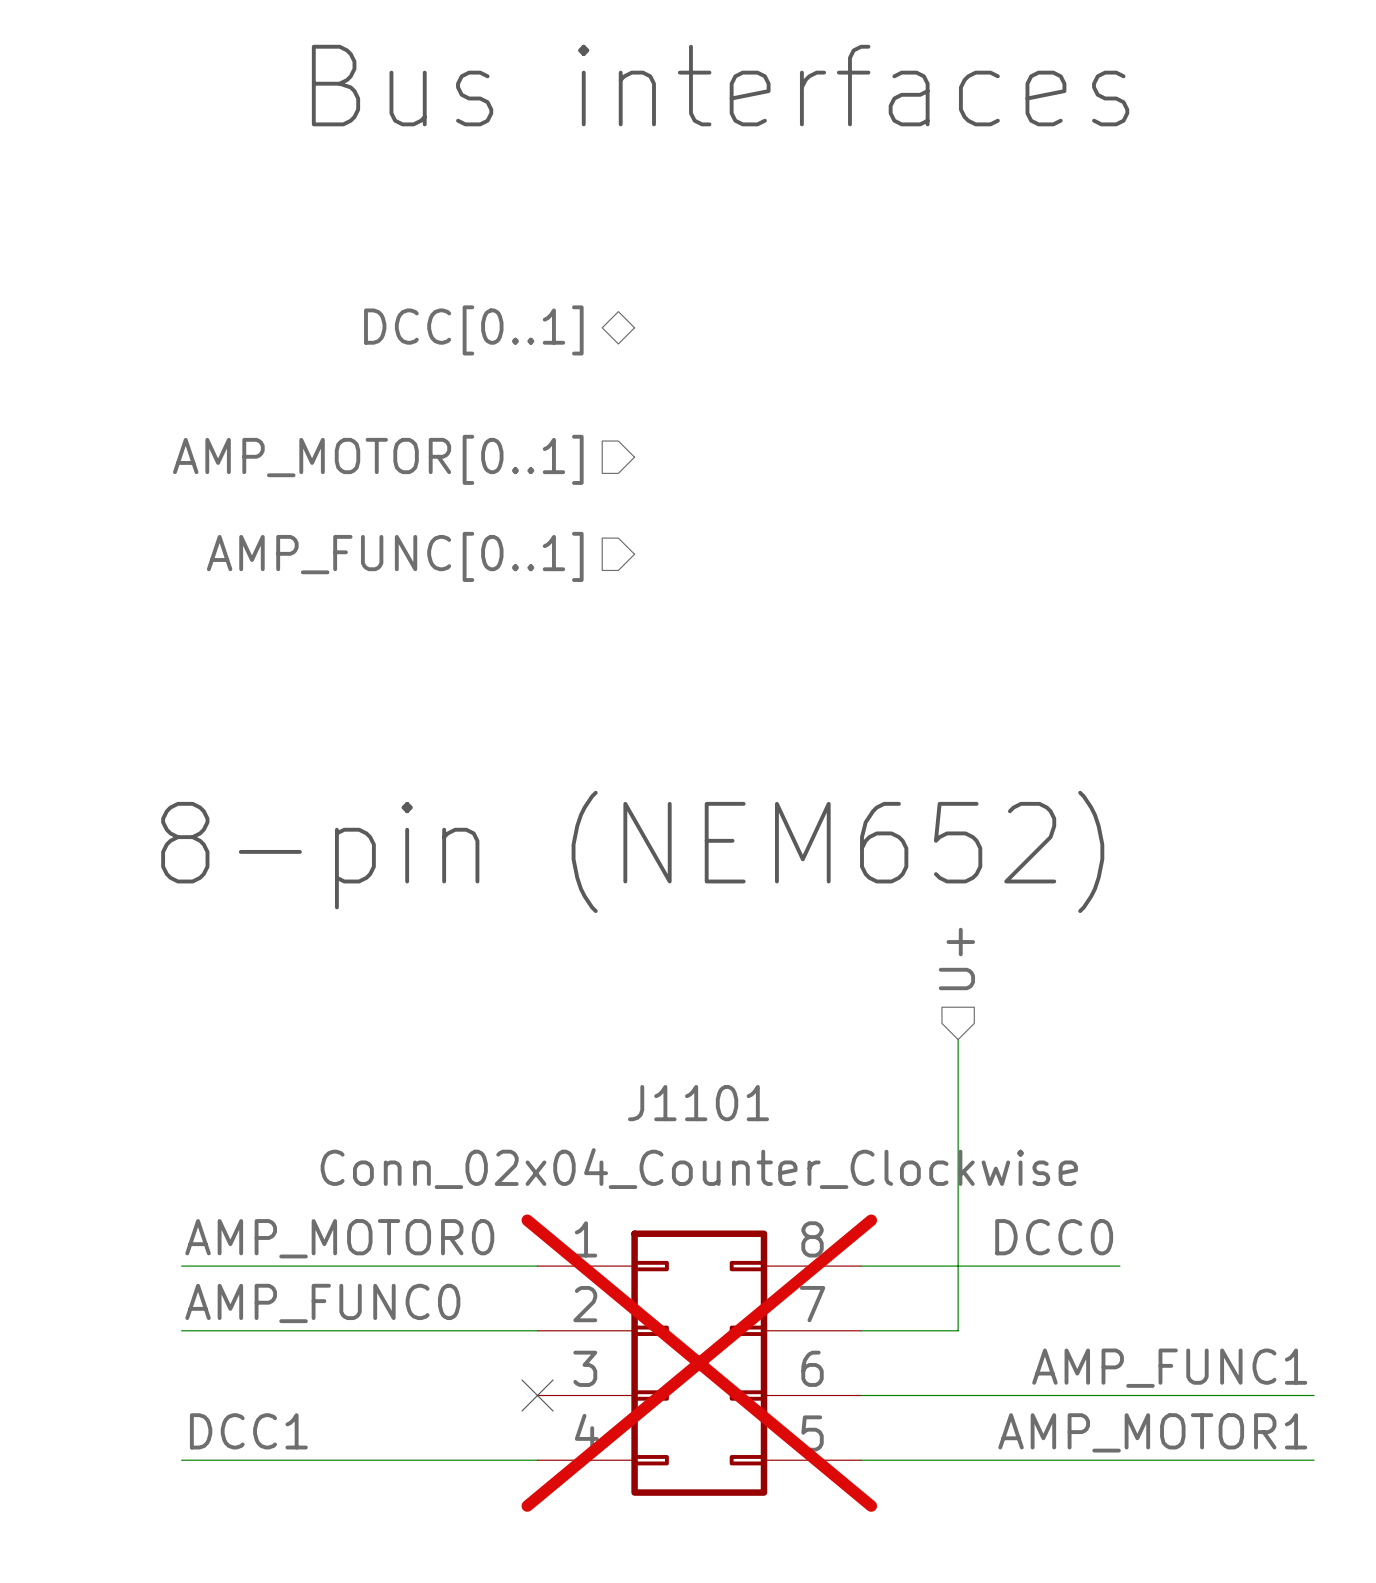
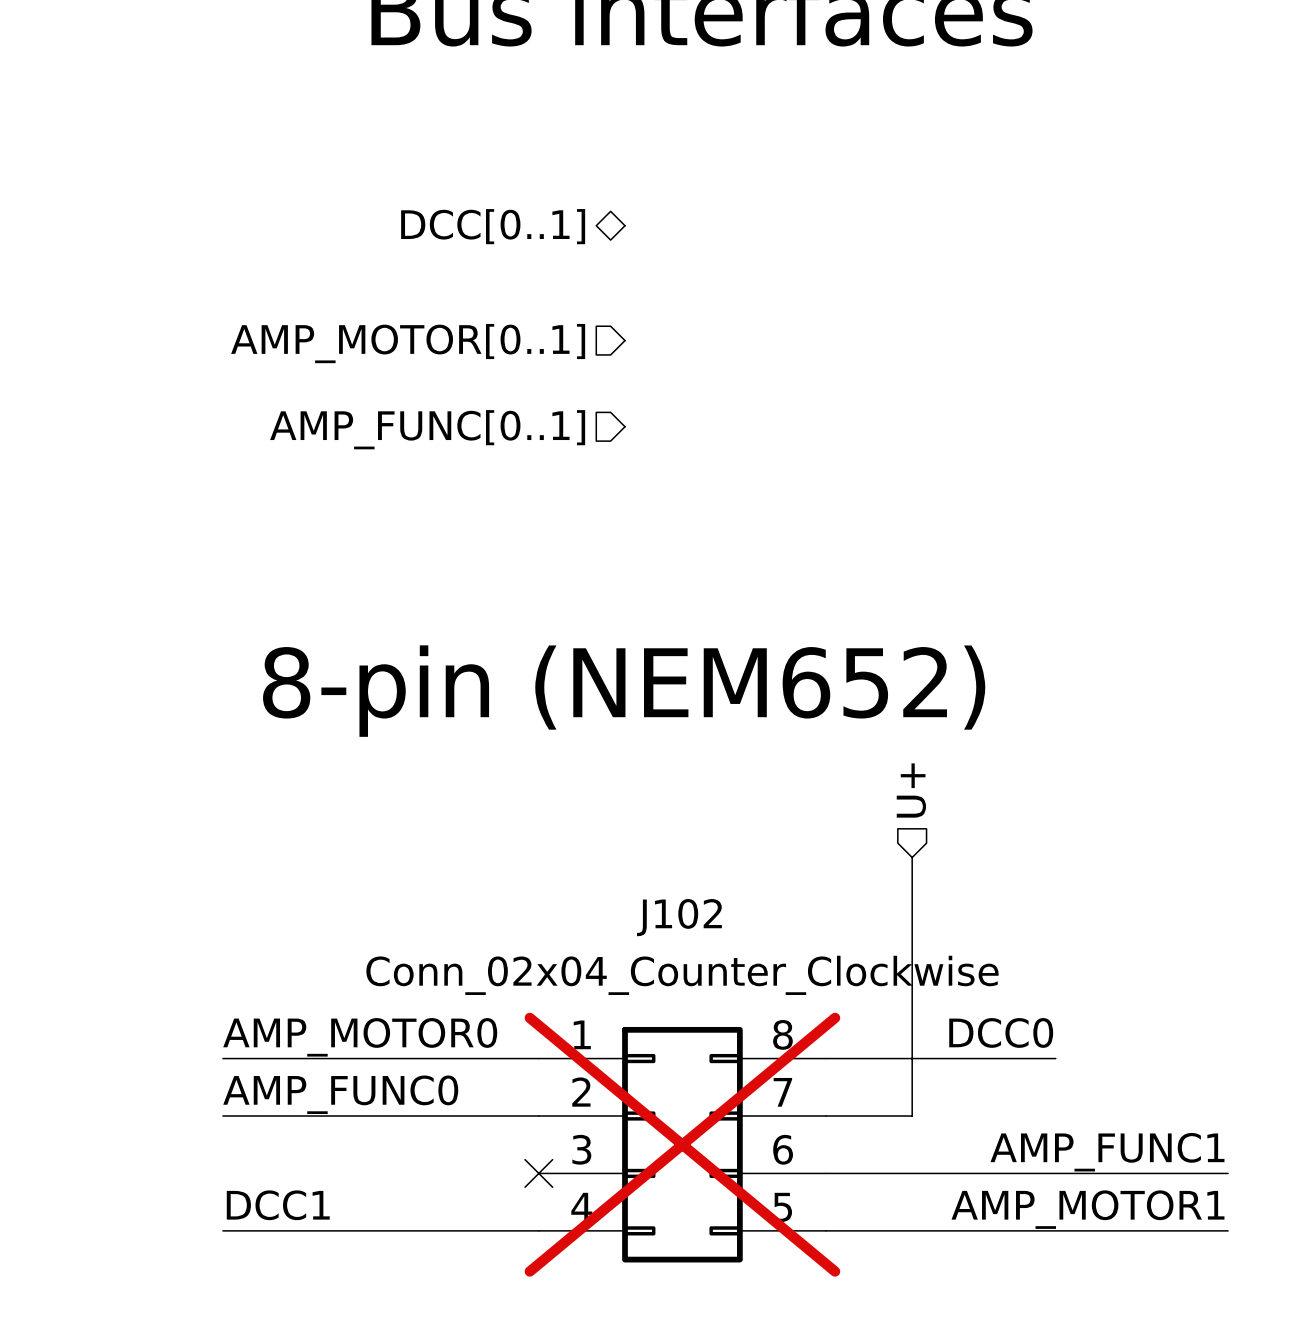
J1101 name: J1101 (698, 1103) -> J102 (679, 917)

